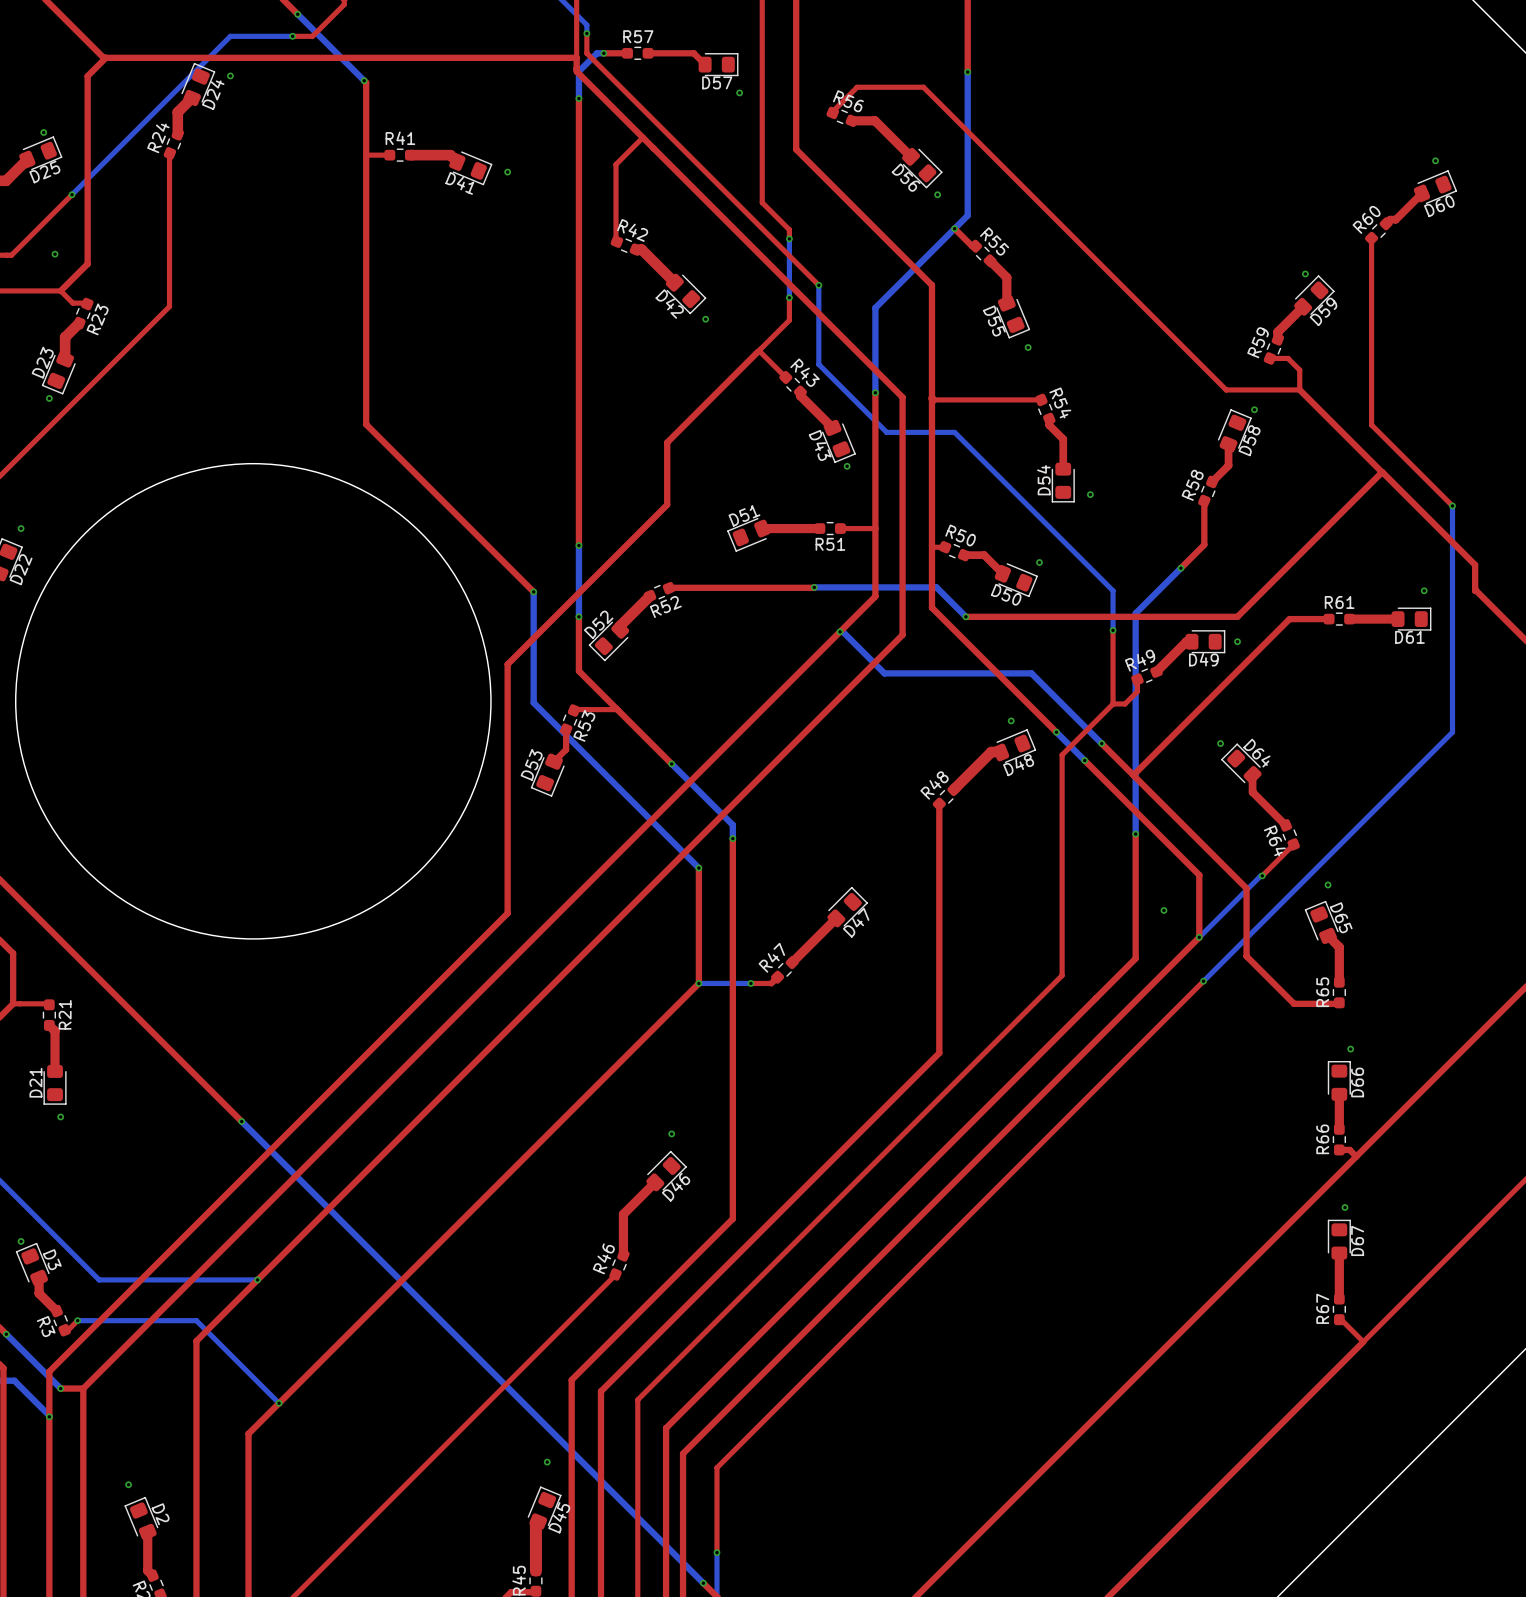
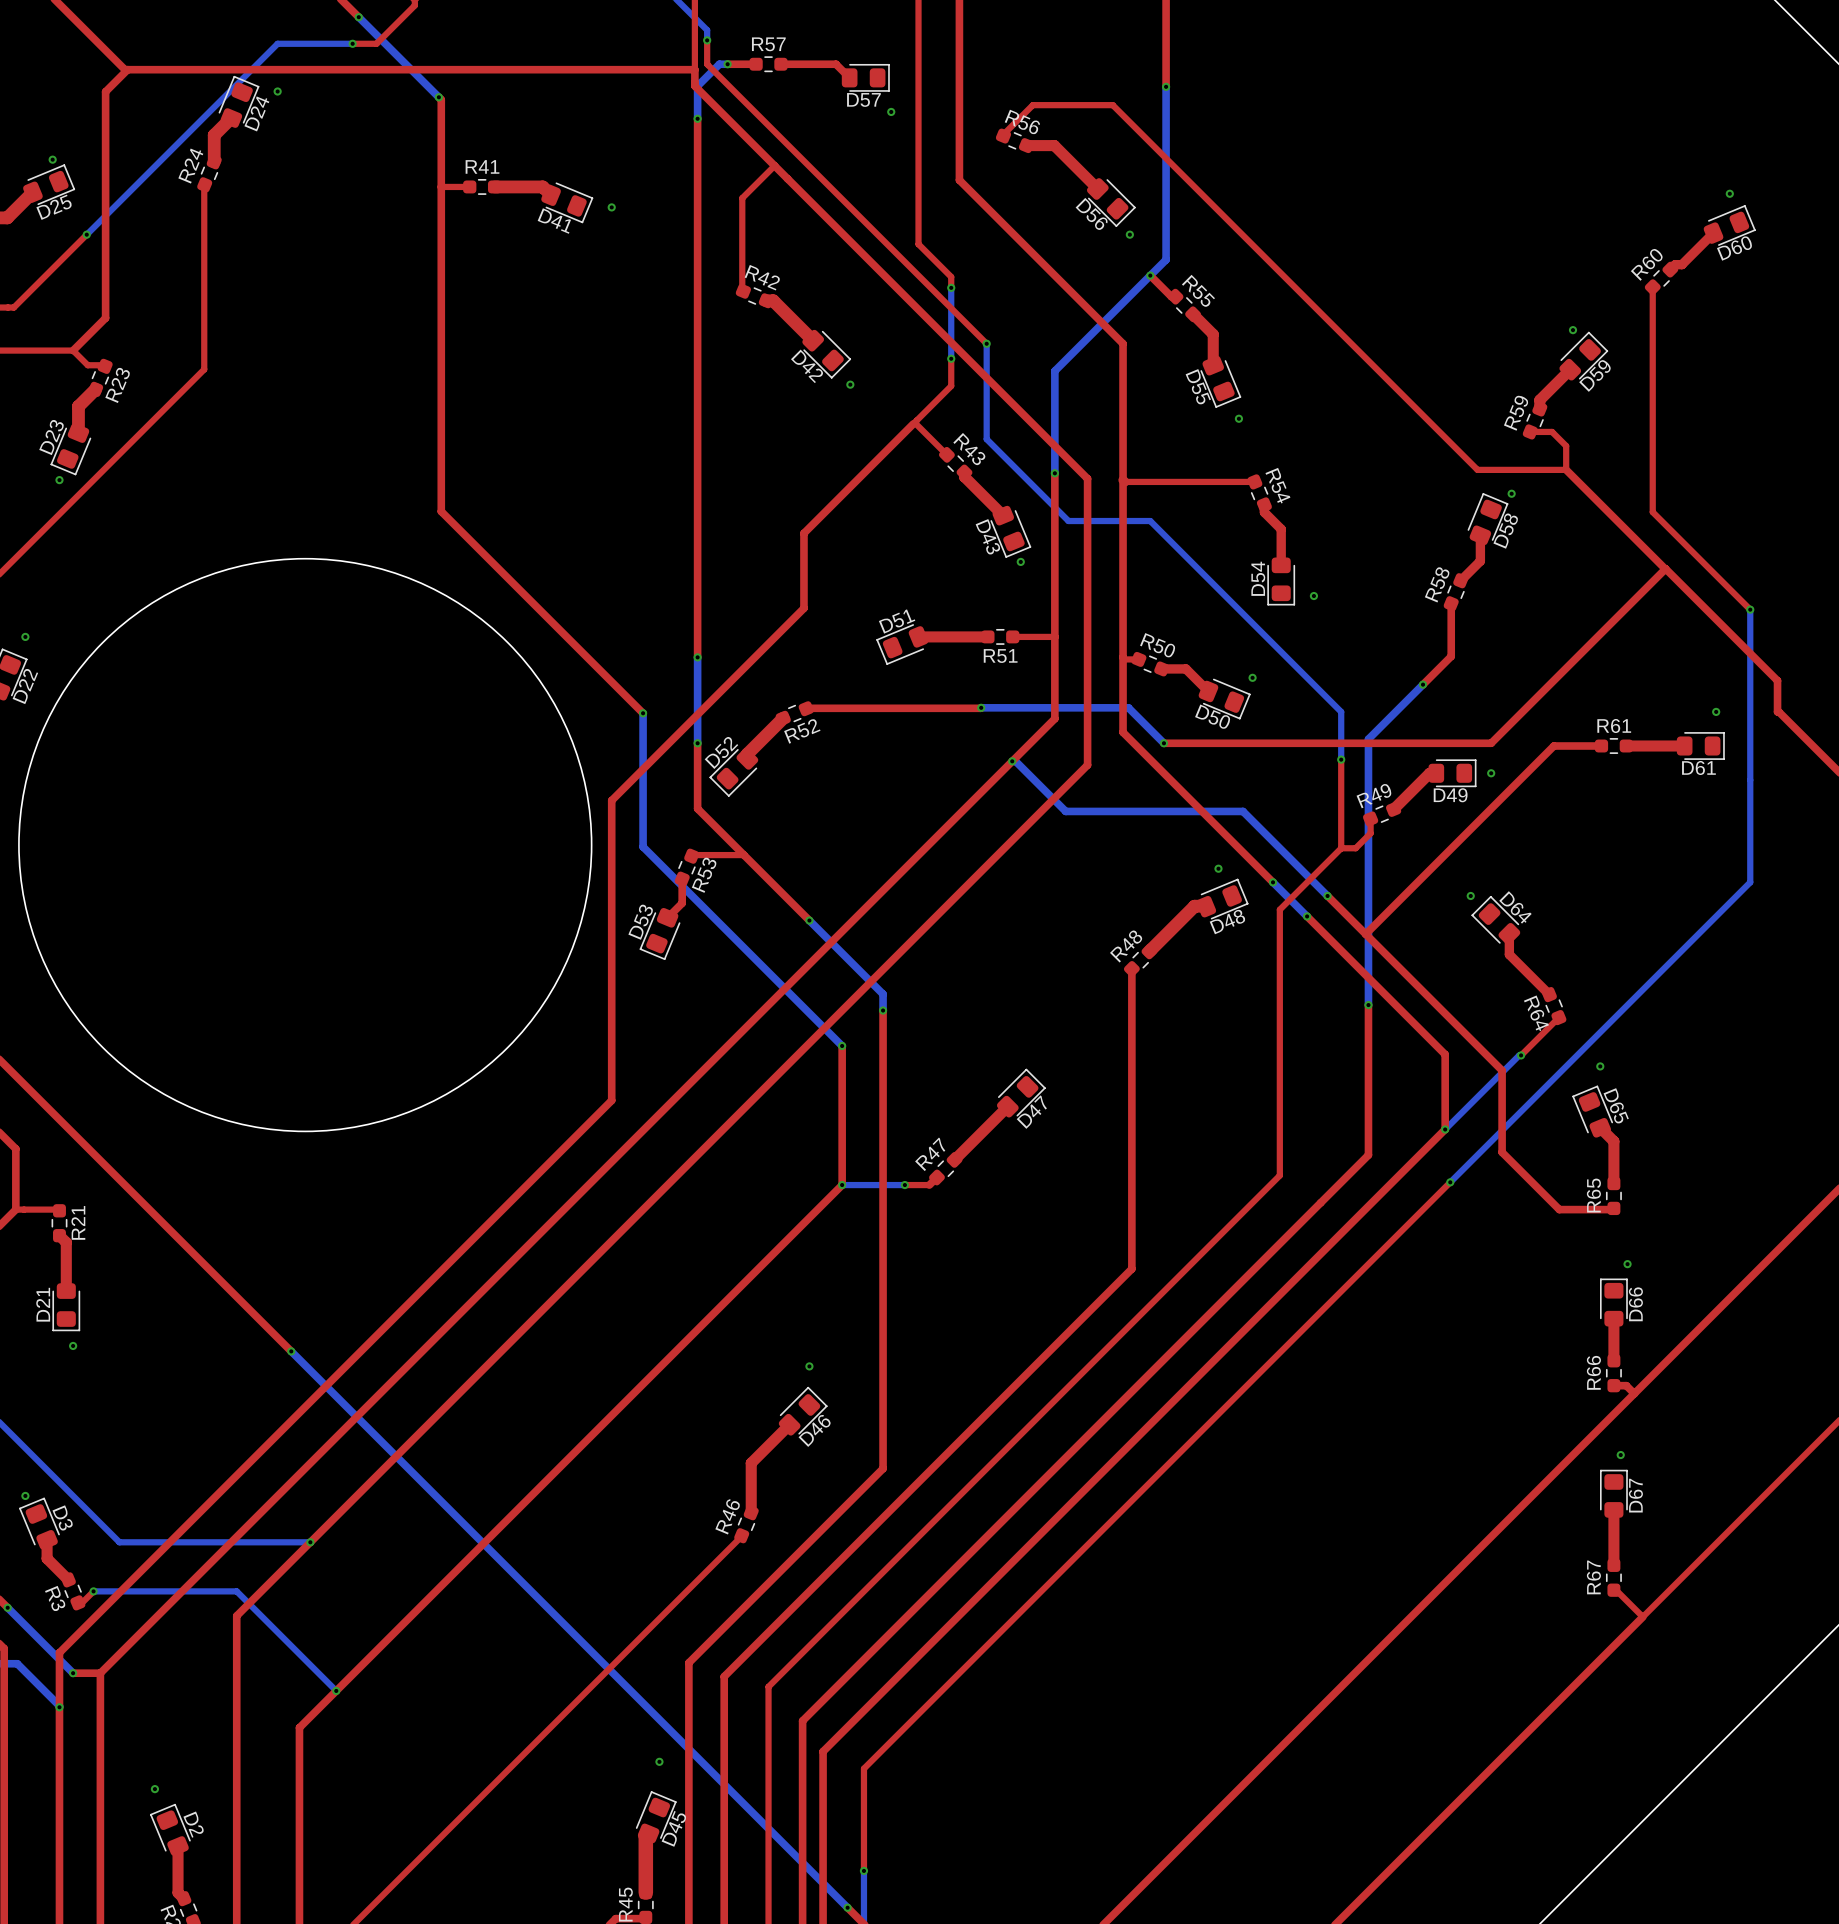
via: (55, 254) -> none
via: (1163, 910) -> none

